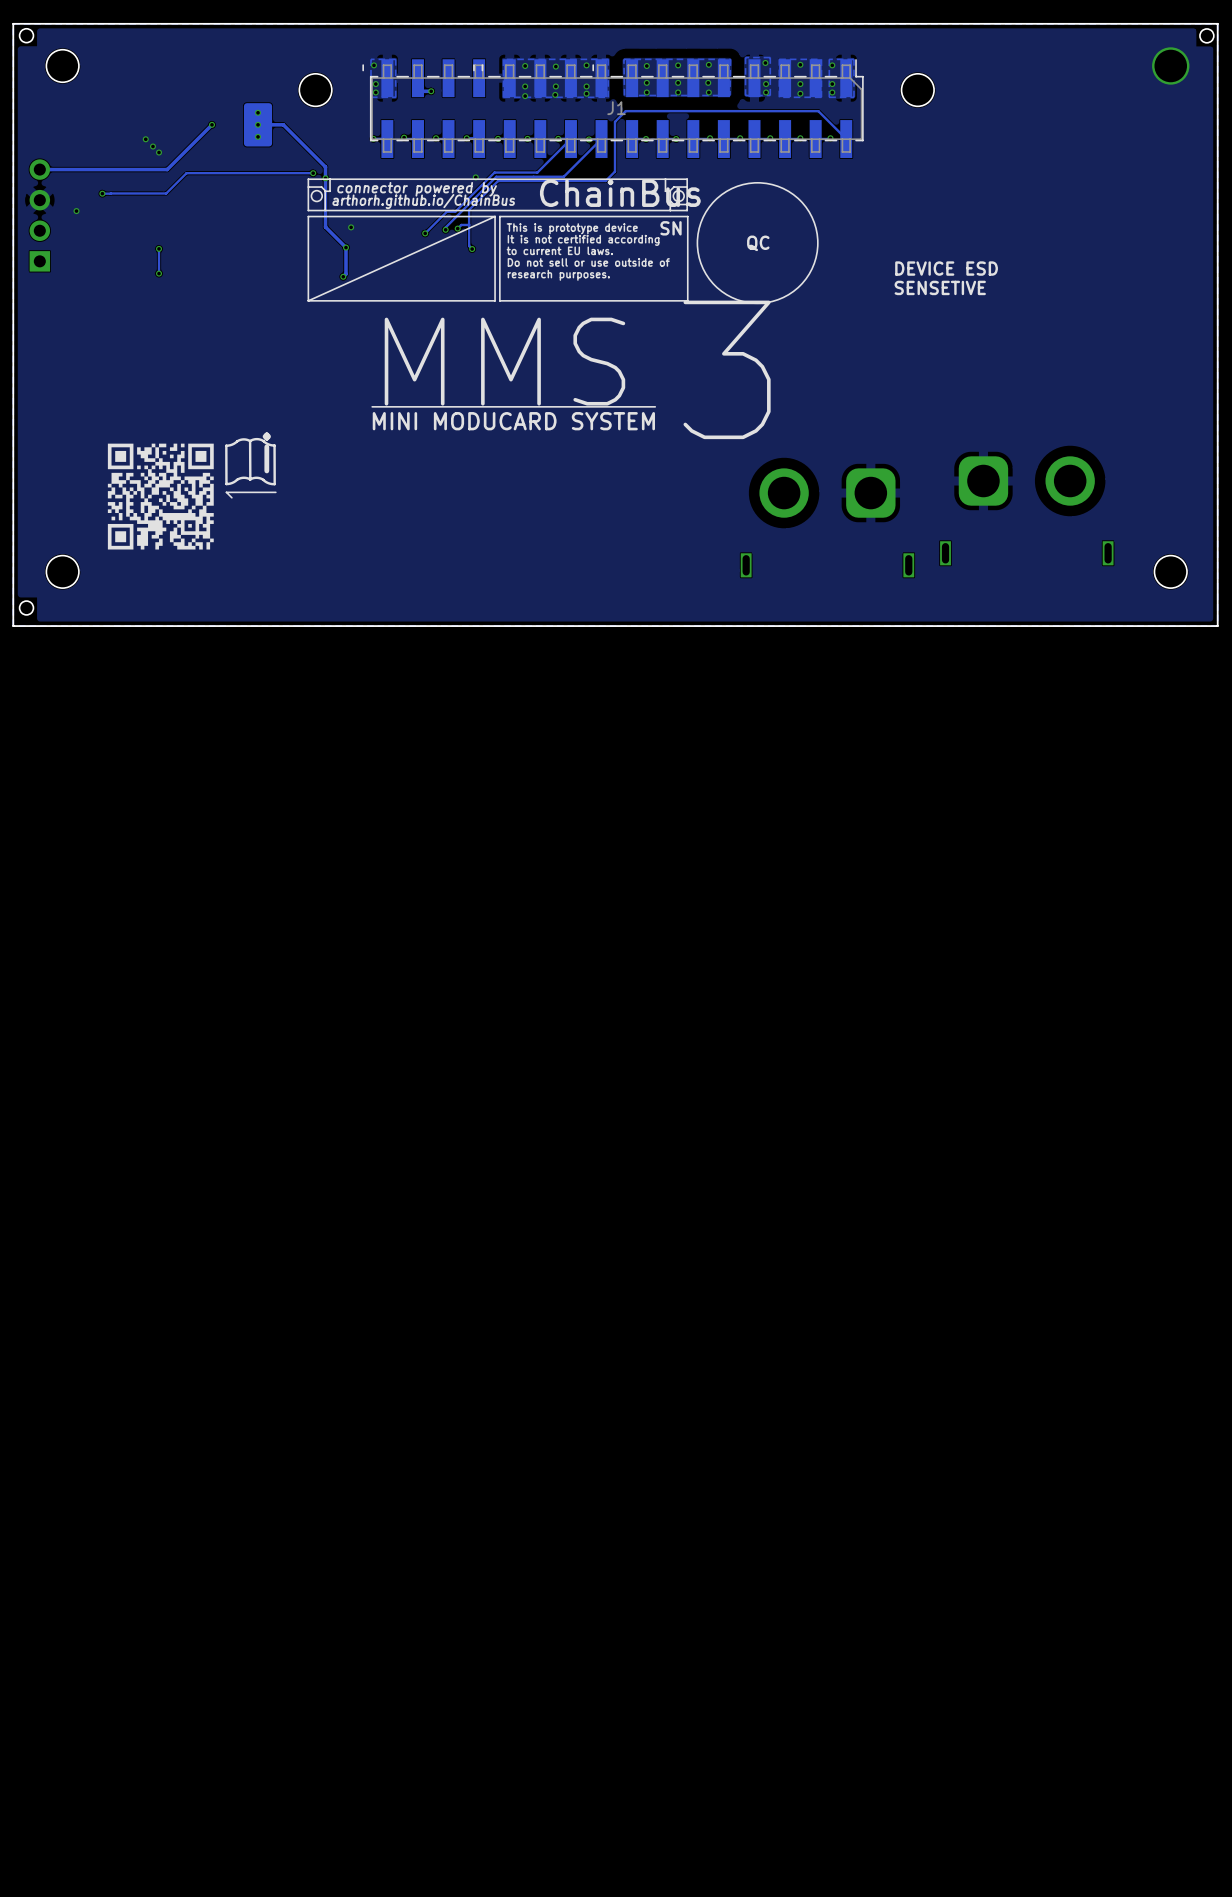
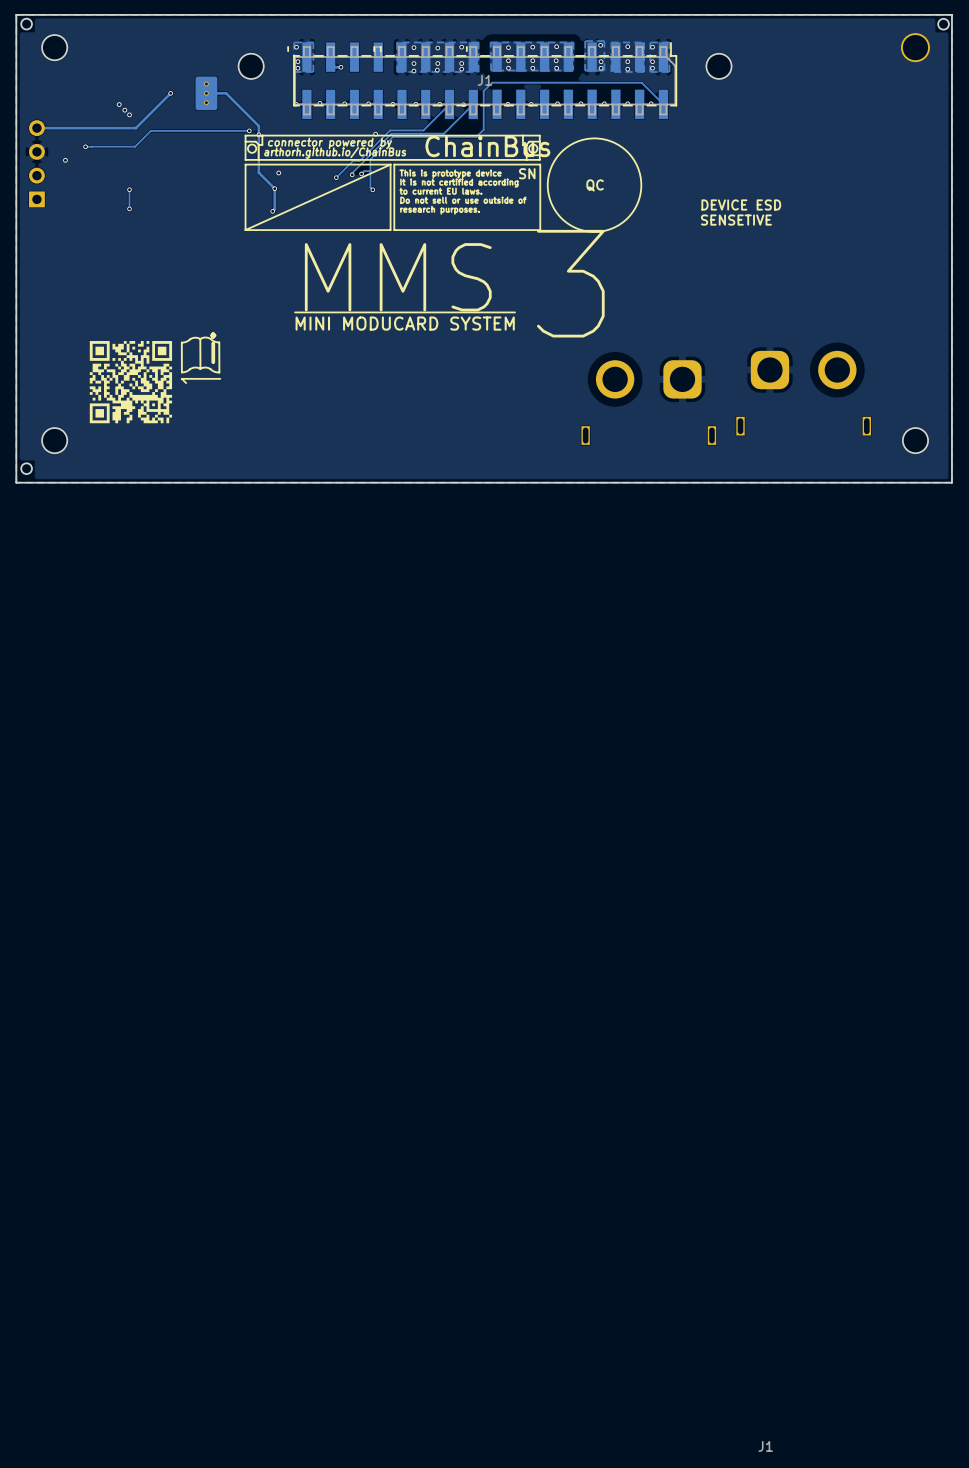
text: none -> J1 (765, 1446)

